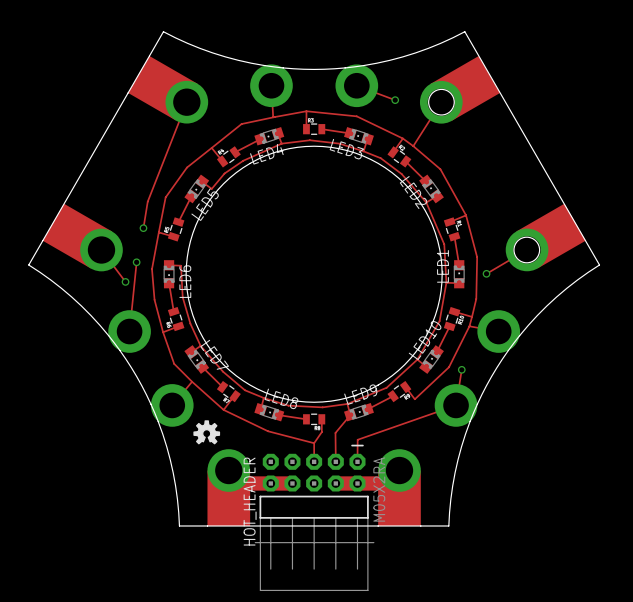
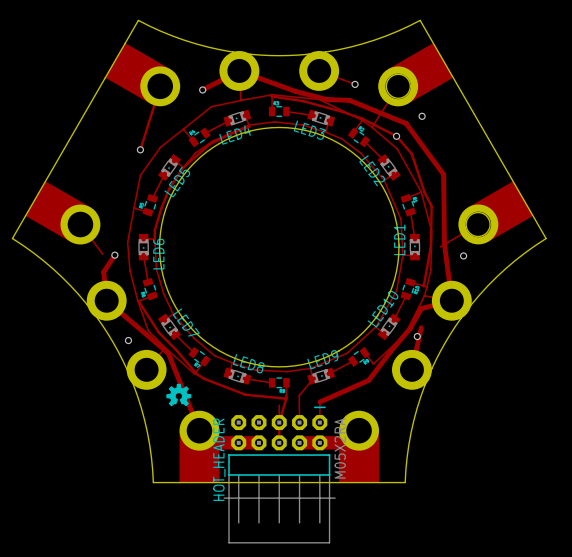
track: (186, 102) (147, 201) (143, 228) -> (160, 86) (140, 149)
via: none -> (202, 89)
track: none -> (271, 96) (303, 101) (362, 118) (396, 136) (411, 153) (424, 192) (431, 206) (430, 246) (423, 286)
via: none -> (422, 116)
track: none -> (249, 126) (209, 144) (183, 167) (169, 188) (154, 230) (154, 238)
via: none -> (396, 136)
via: none -> (140, 149)
via: (143, 228) -> none
track: (136, 262) (129, 331) -> none
via: (136, 262) -> none
via position: (486, 273) -> (463, 255)
via: (125, 281) -> none
track: none -> (114, 255) (103, 271) (106, 300) (168, 353) (199, 430)
via: none -> (114, 255)
track: none -> (138, 301) (158, 332) (196, 374) (245, 394) (286, 398)
track: none -> (421, 327) (411, 369)
track: (461, 369) (456, 405) (357, 439) -> (202, 89) (239, 70) (296, 91) (327, 99) (349, 100) (406, 123) (443, 174) (444, 243) (451, 300) (421, 308) (410, 328) (368, 380) (319, 401)
via: none -> (128, 340)
track: (223, 409) (268, 431) (314, 443) (321, 432) -> (279, 442) (279, 422) (286, 394)

